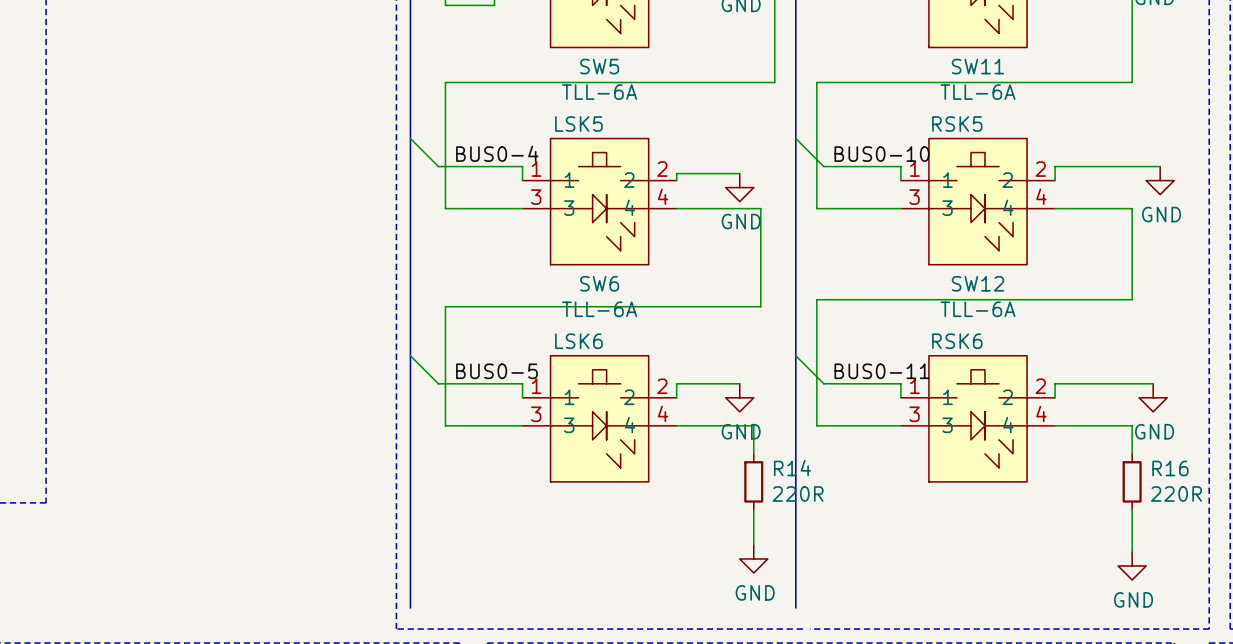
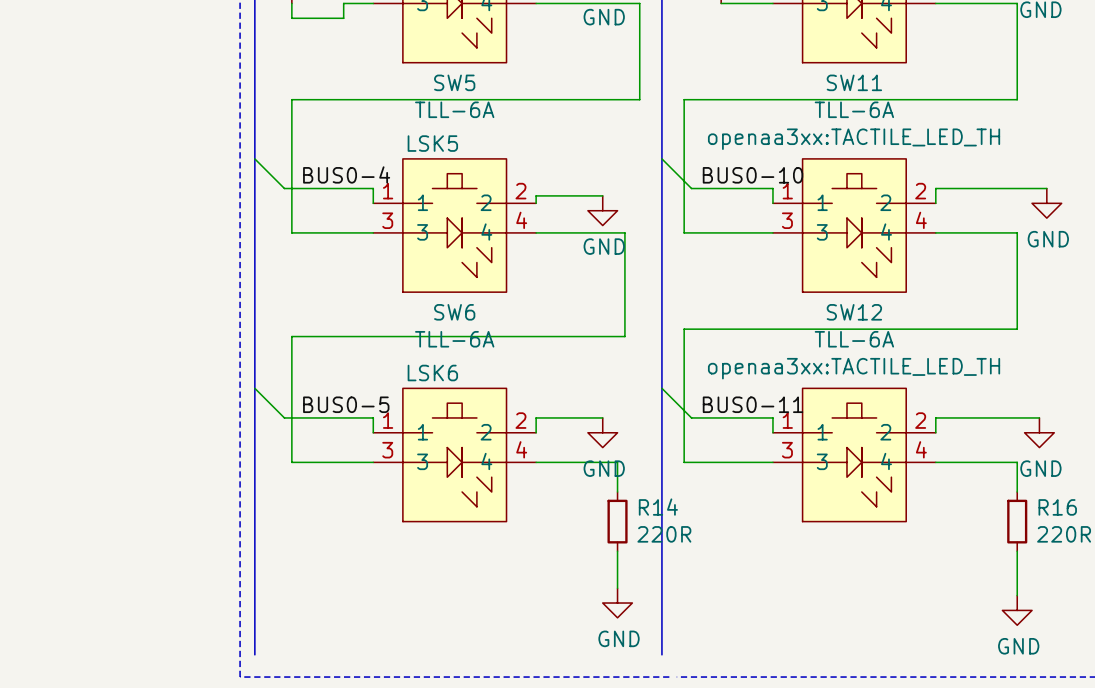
SW11 text: none -> openaa3xx:TACTILE_LED_TH (854, 139)
SW11 text: RSK5 (957, 124) -> none
SW12 text: none -> openaa3xx:TACTILE_LED_TH (854, 368)
SW12 text: RSK6 (957, 341) -> none

